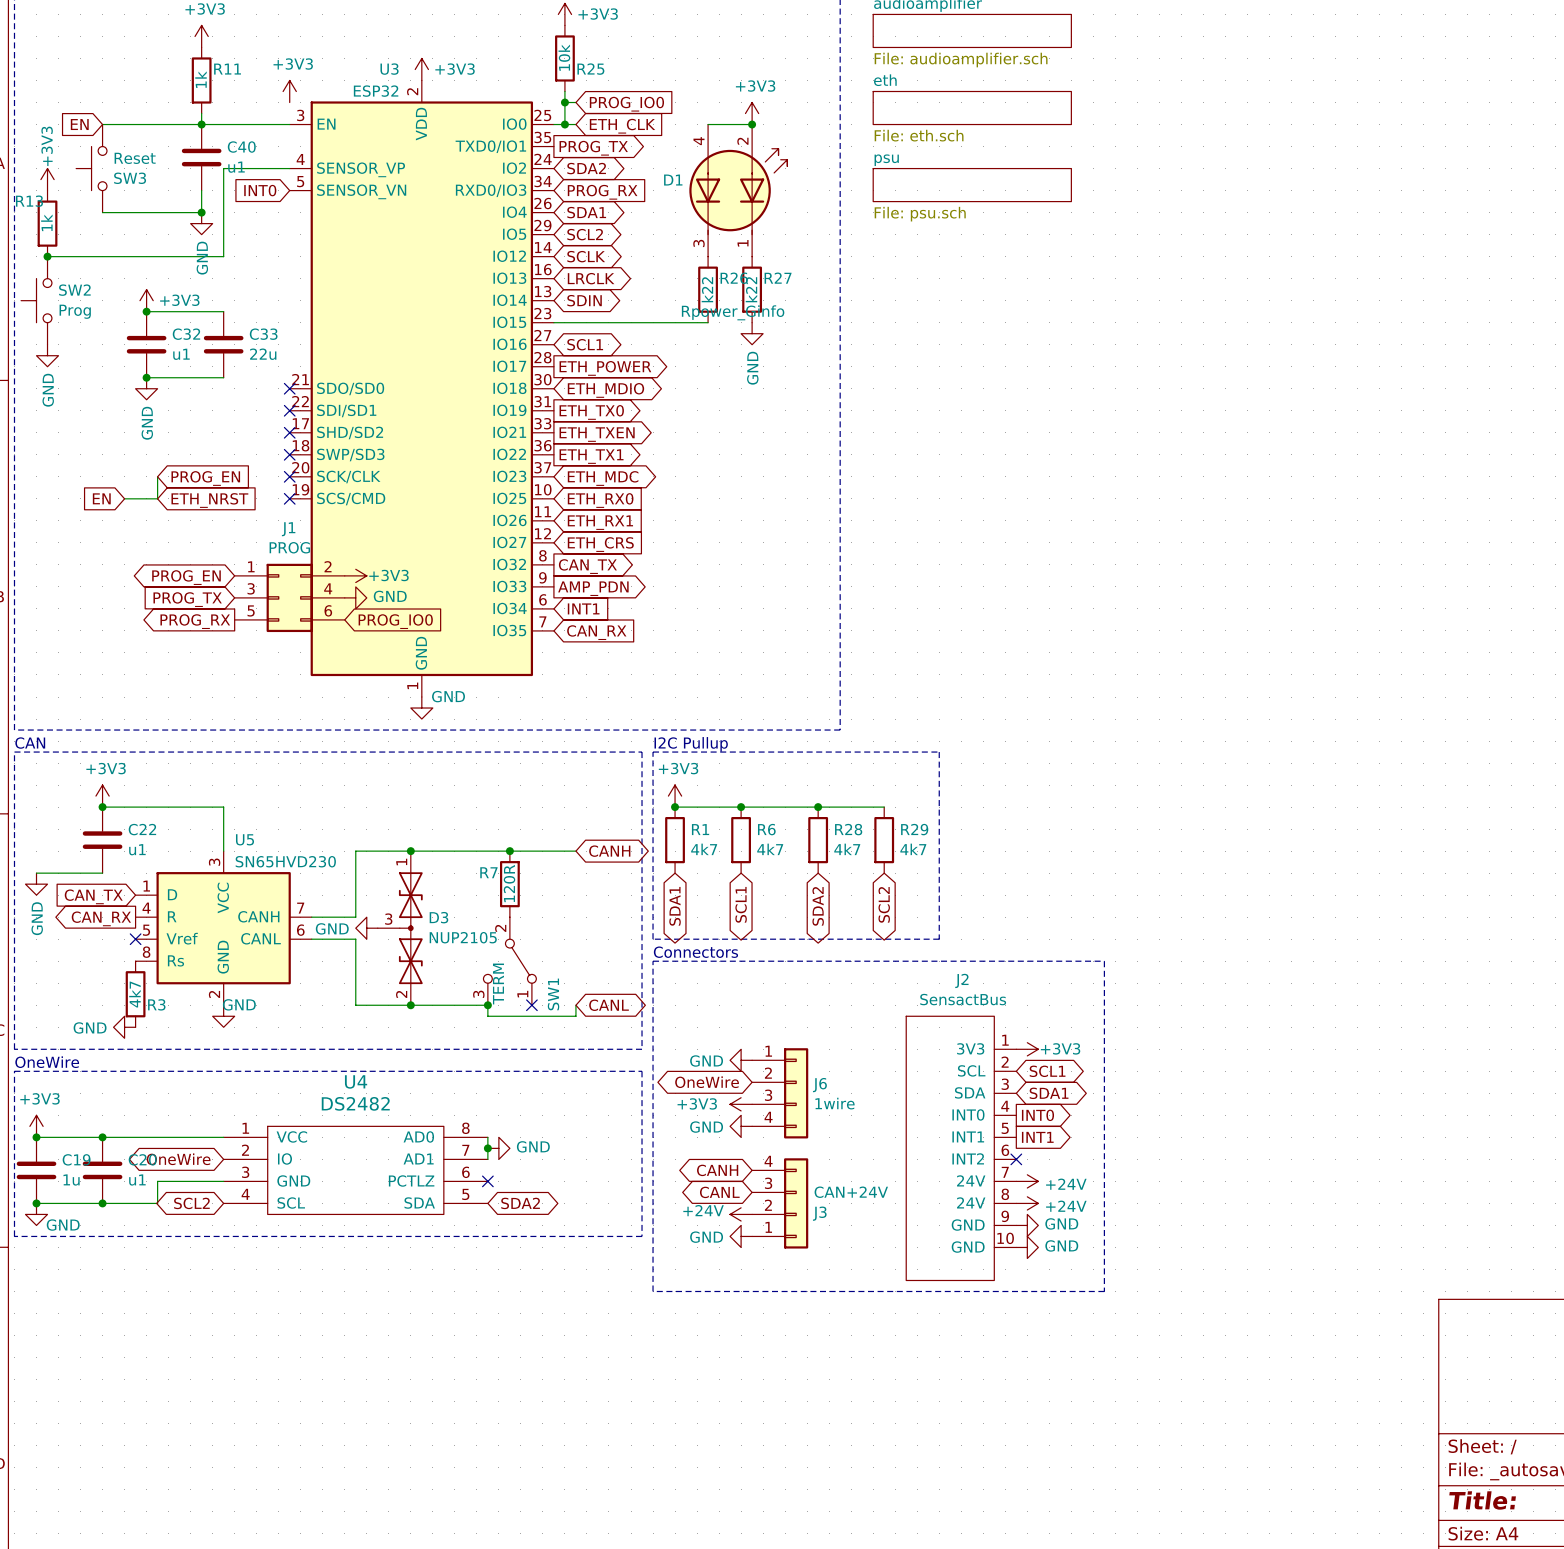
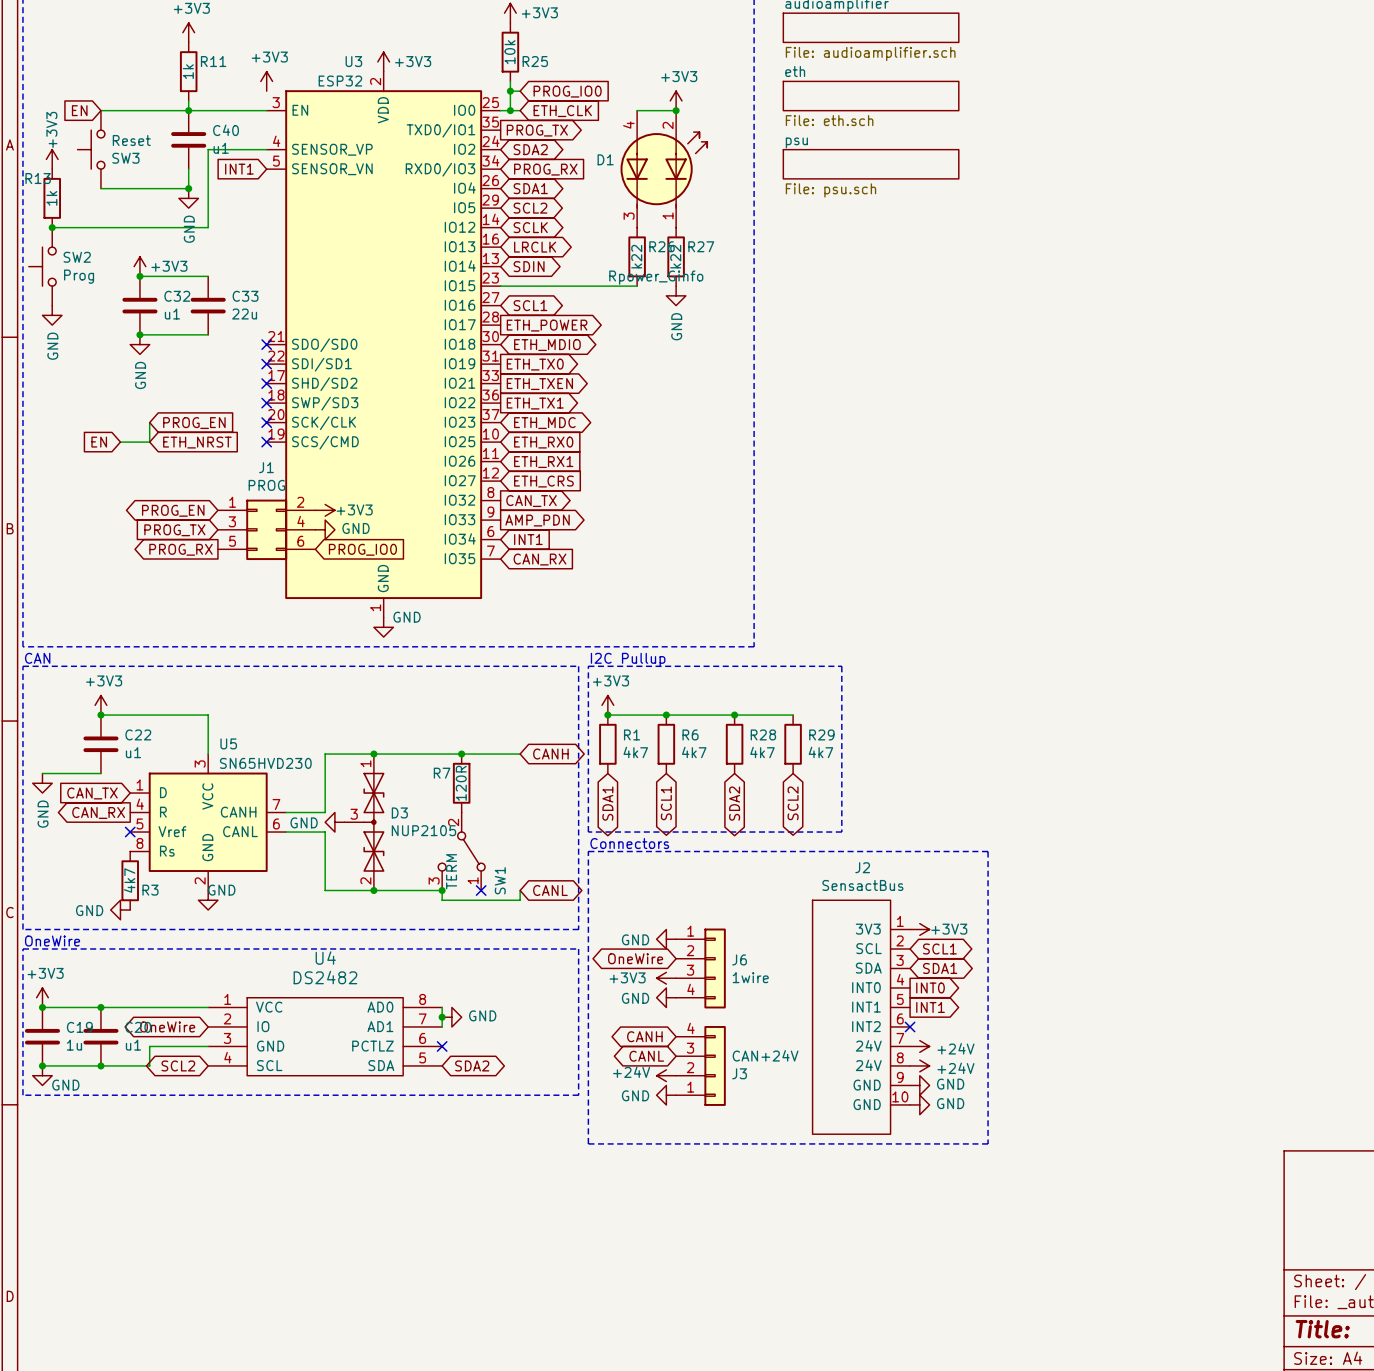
global label: INT0 (260, 190) -> INT1 (239, 169)

